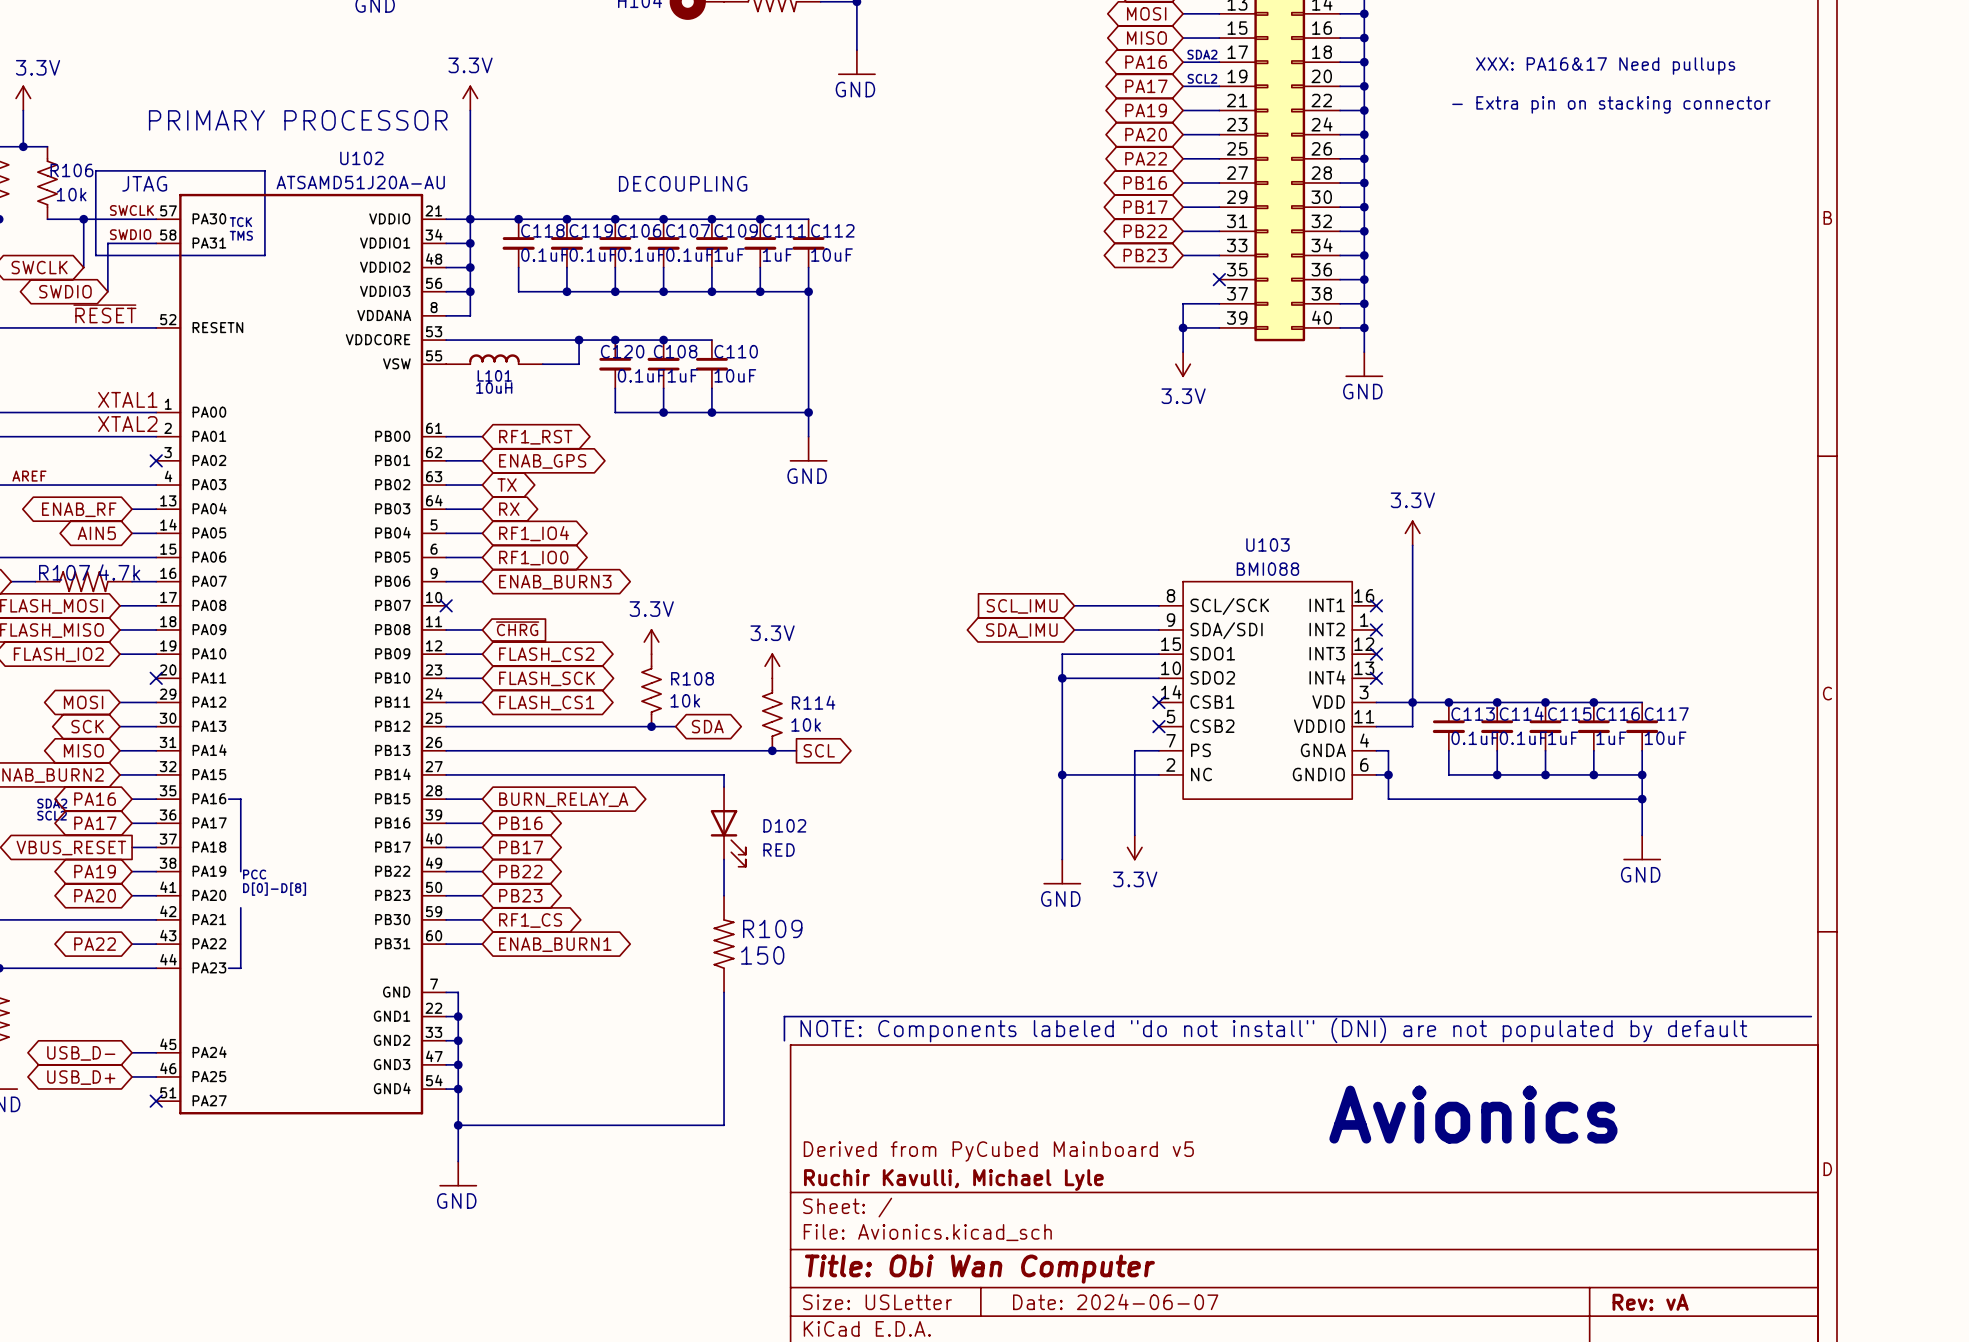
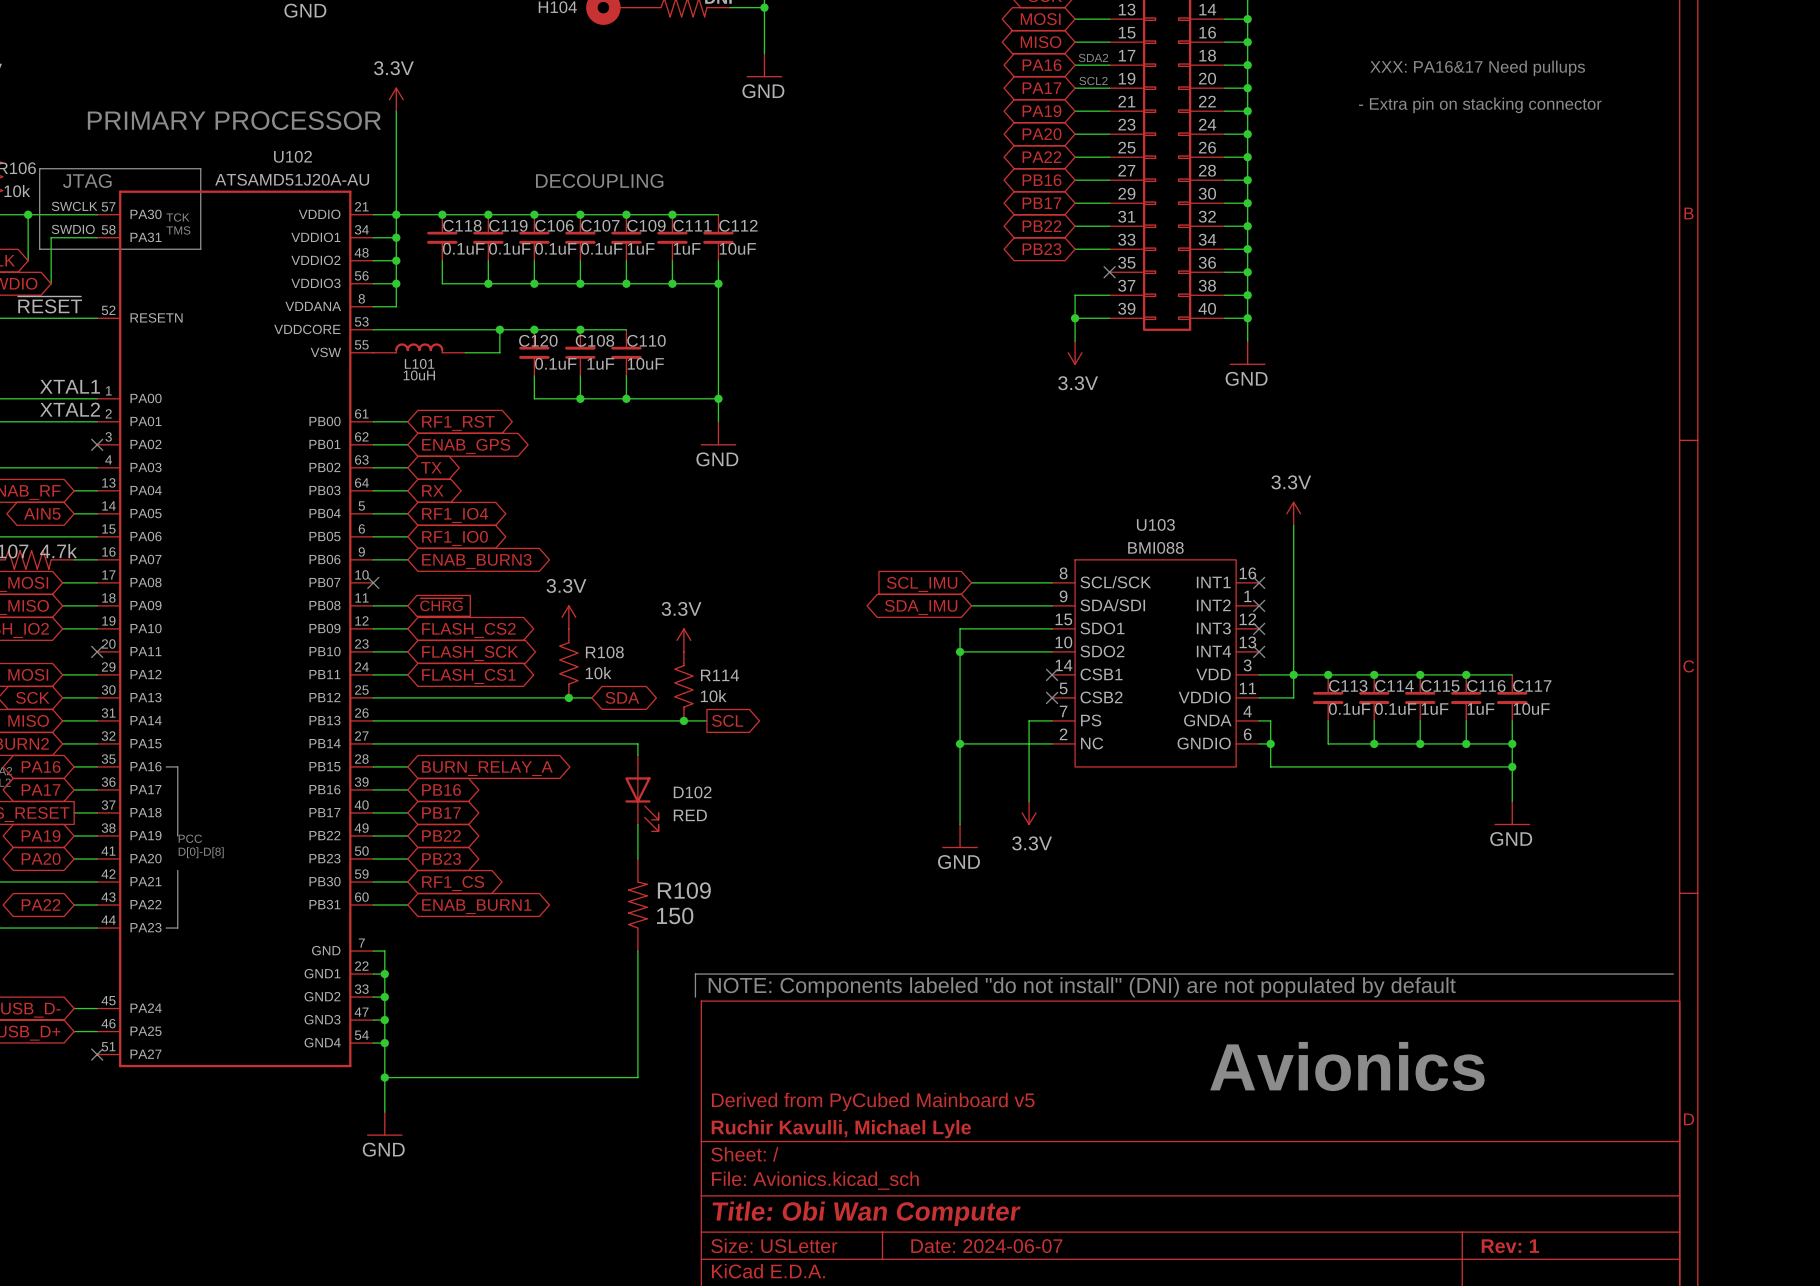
title block: Rev: vA (1650, 1302) -> Rev: 1 (1510, 1246)

